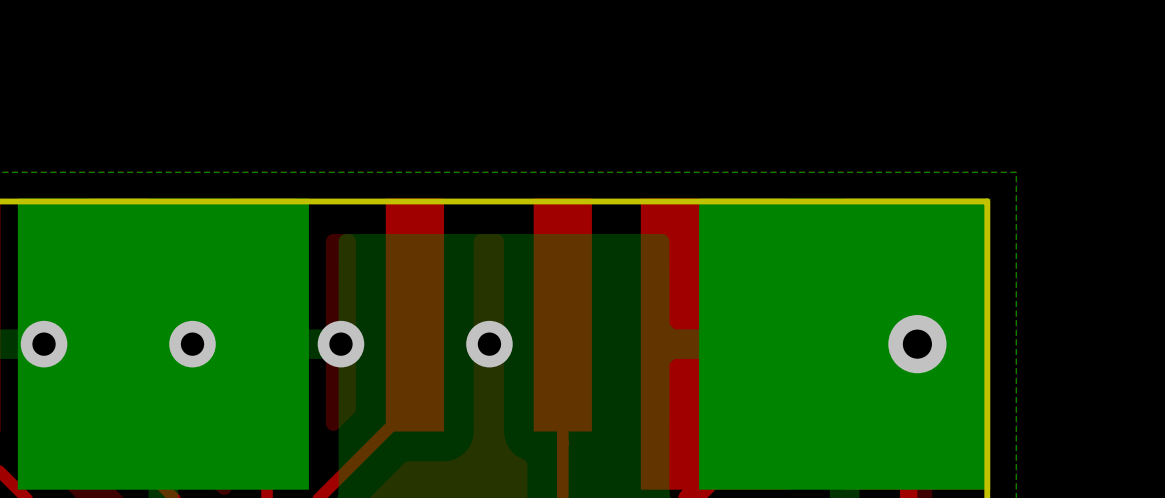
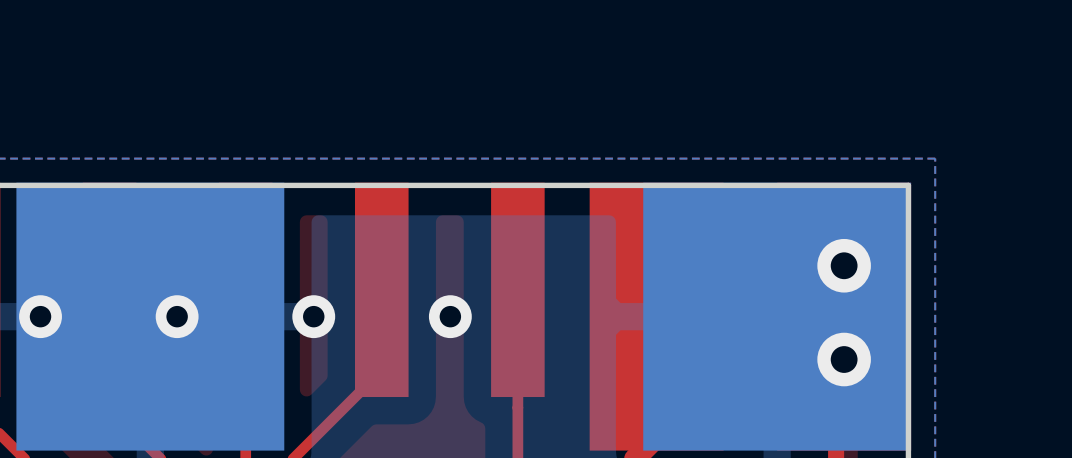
via: none -> (844, 265)
via: (917, 344) -> none
via: none -> (844, 359)

